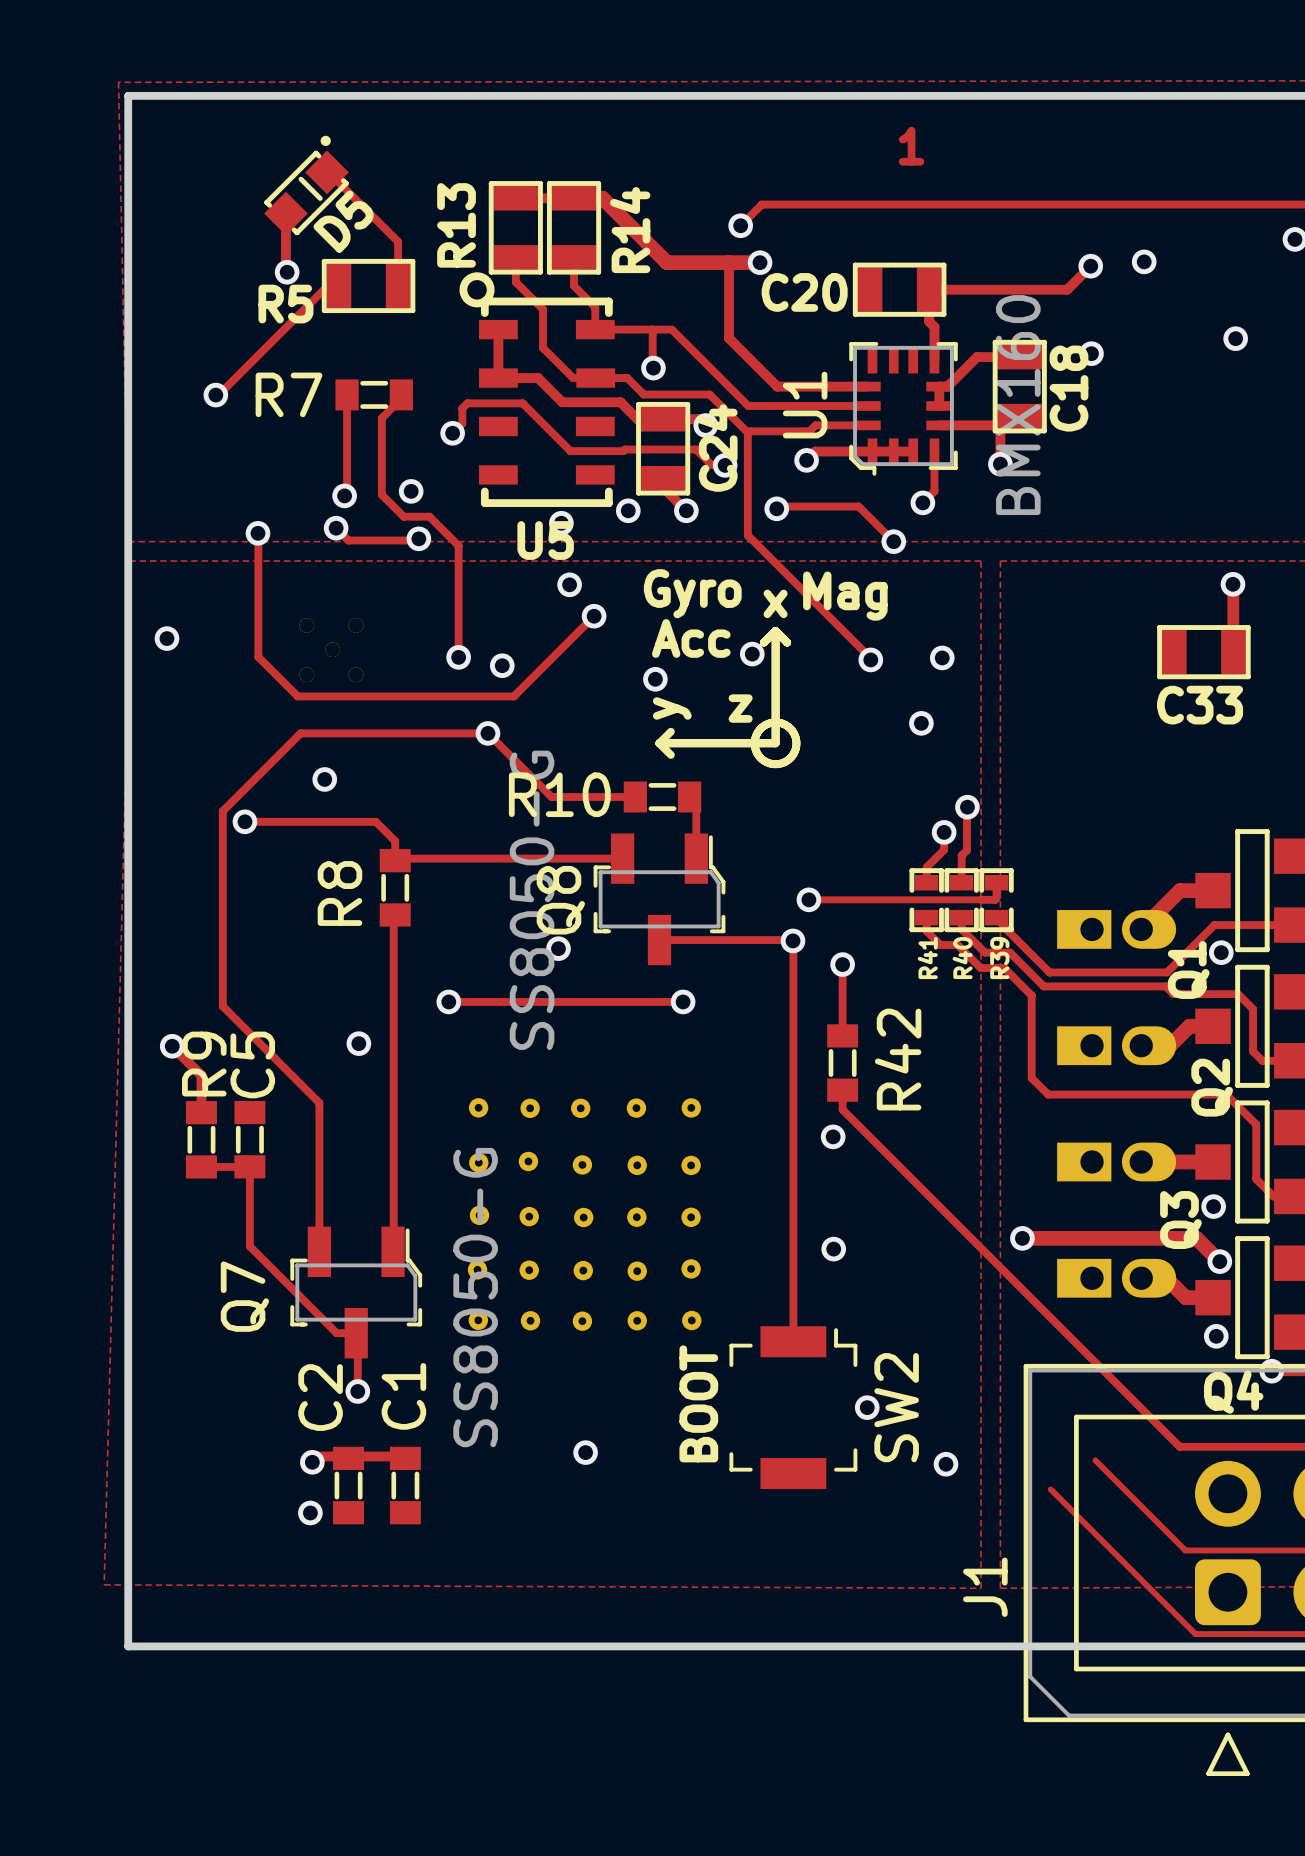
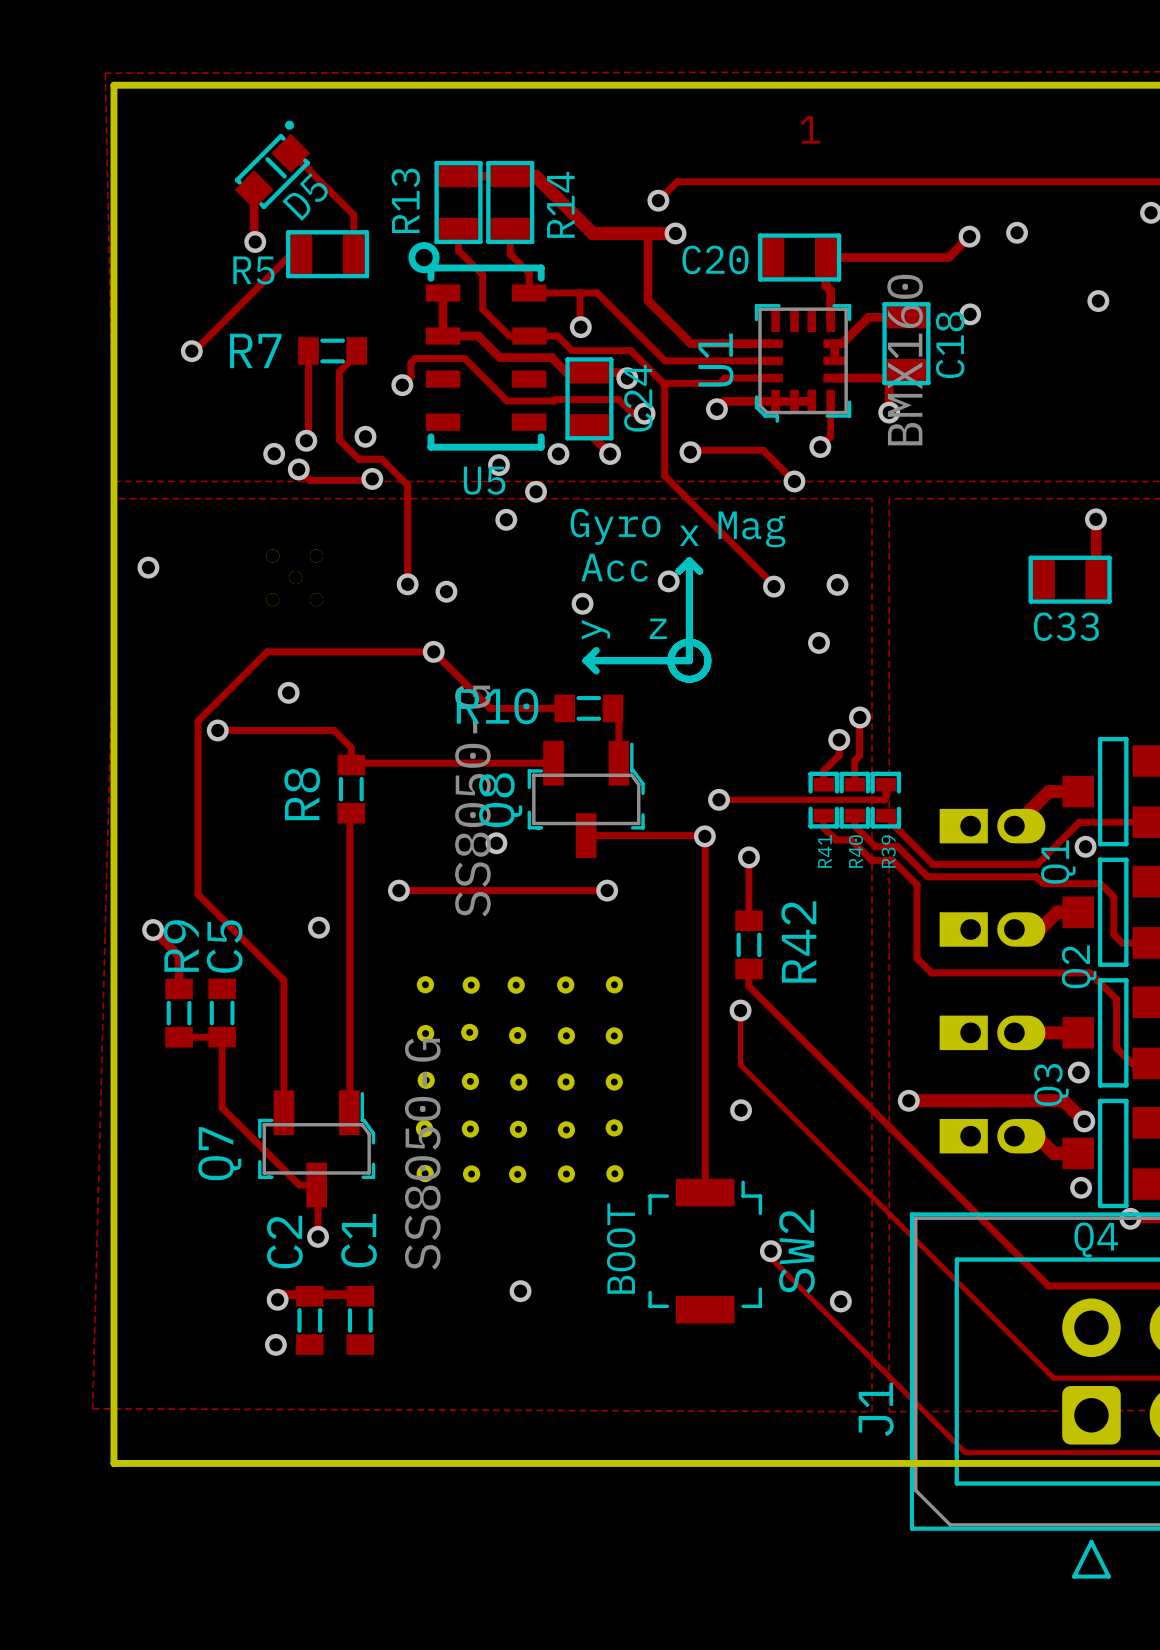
via position: (257, 533) -> (274, 453)
track: (258, 537) (258, 657) (297, 696) (513, 696) (594, 616) -> none
via position: (594, 616) -> (536, 491)
track: none -> (740, 1010) (740, 1065) (973, 1298)
track: (1050, 1489) (1195, 1634) -> (770, 1251) (770, 1258) (965, 1452) (1062, 1452)

